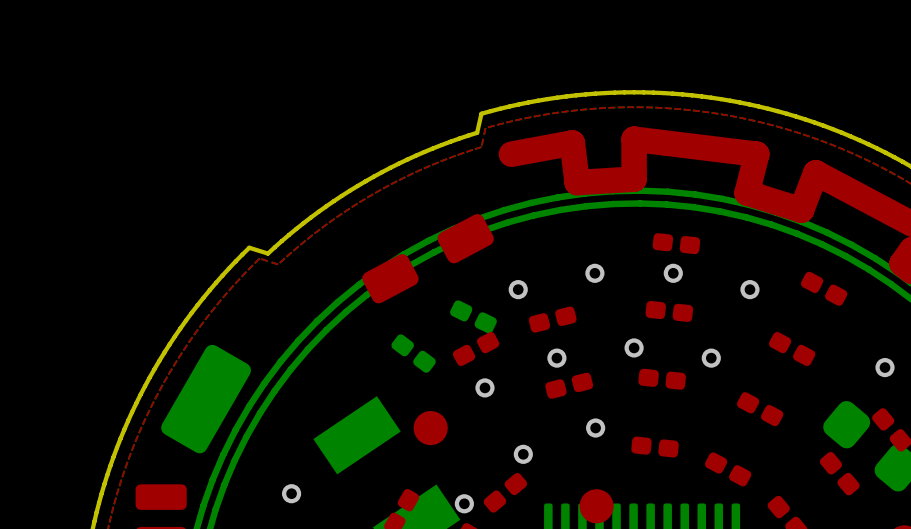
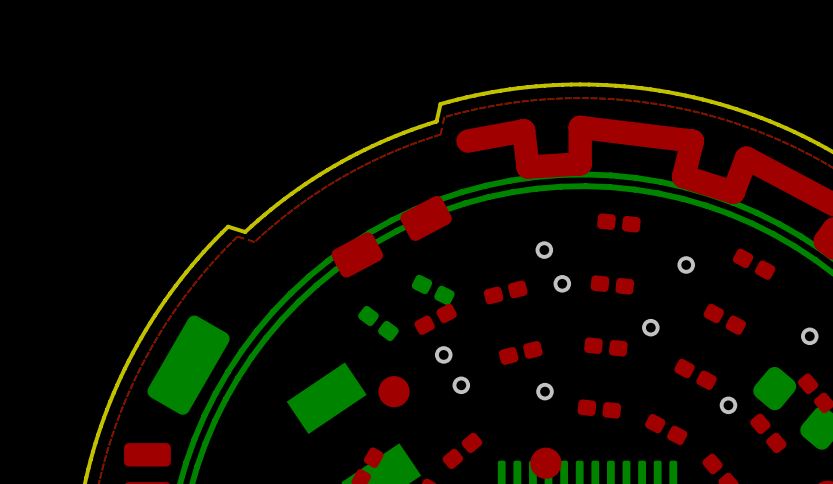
via: (673, 273) -> none
via: (518, 289) -> none
via: none -> (562, 283)
via: (634, 347) -> none
via: (556, 358) -> none
via: none -> (728, 405)
via position: (523, 454) -> (461, 385)
via: (291, 493) -> none
via: (464, 503) -> none

